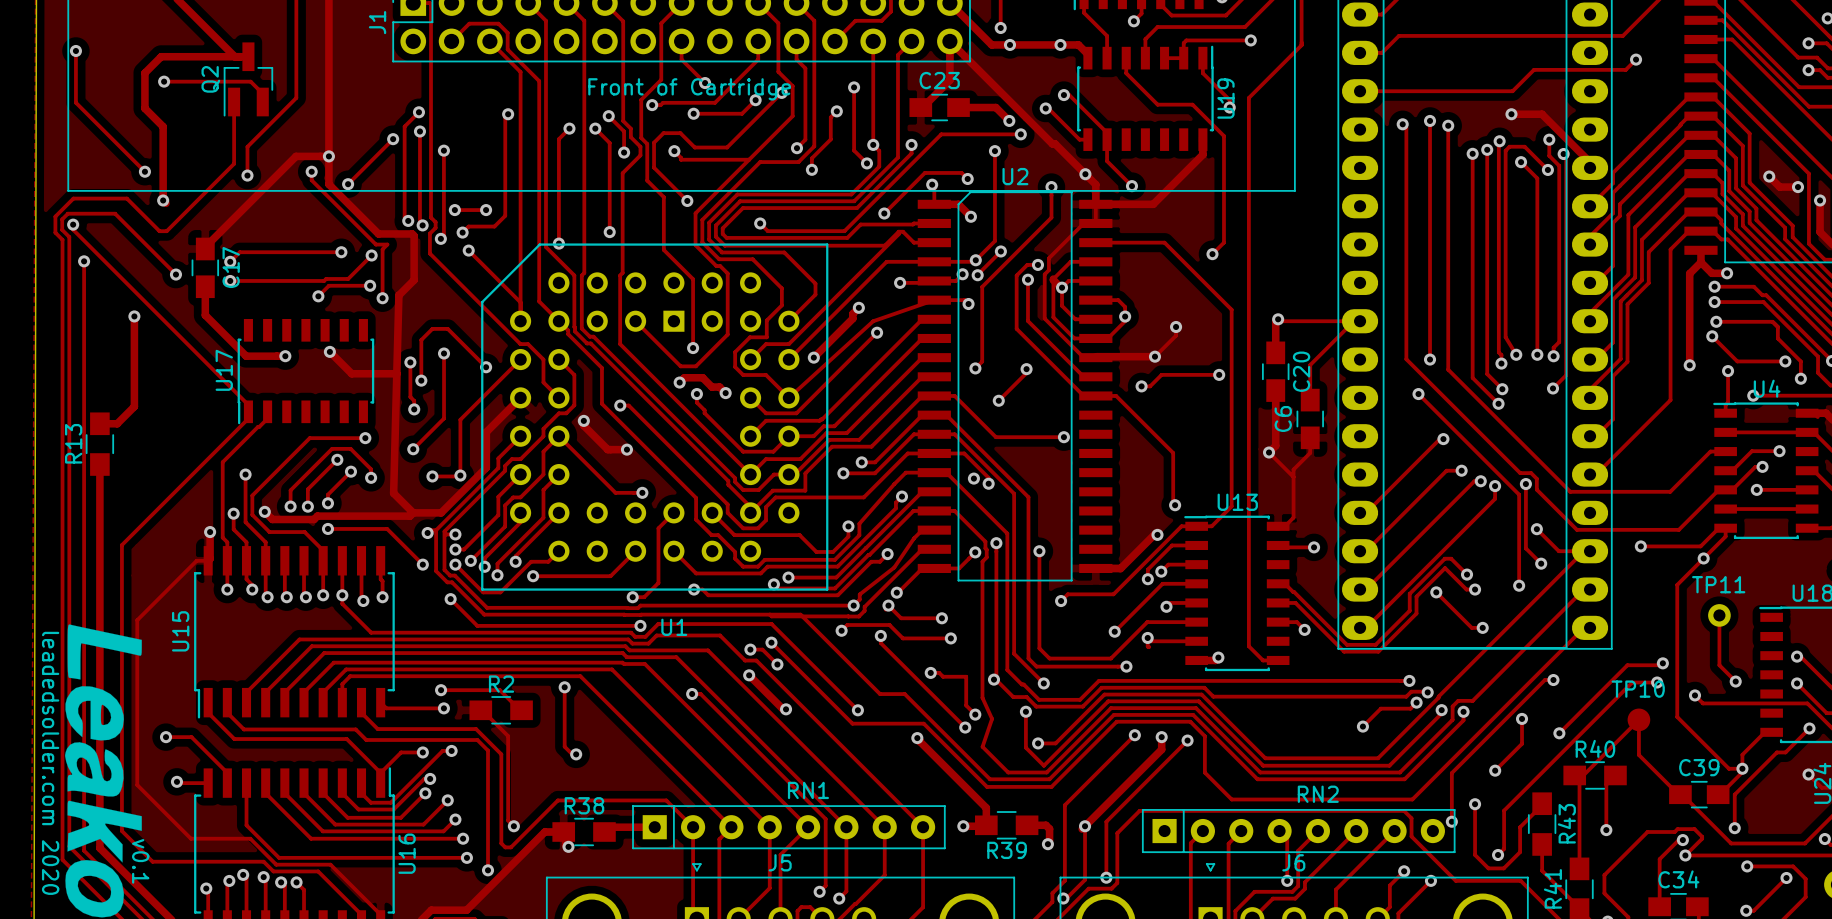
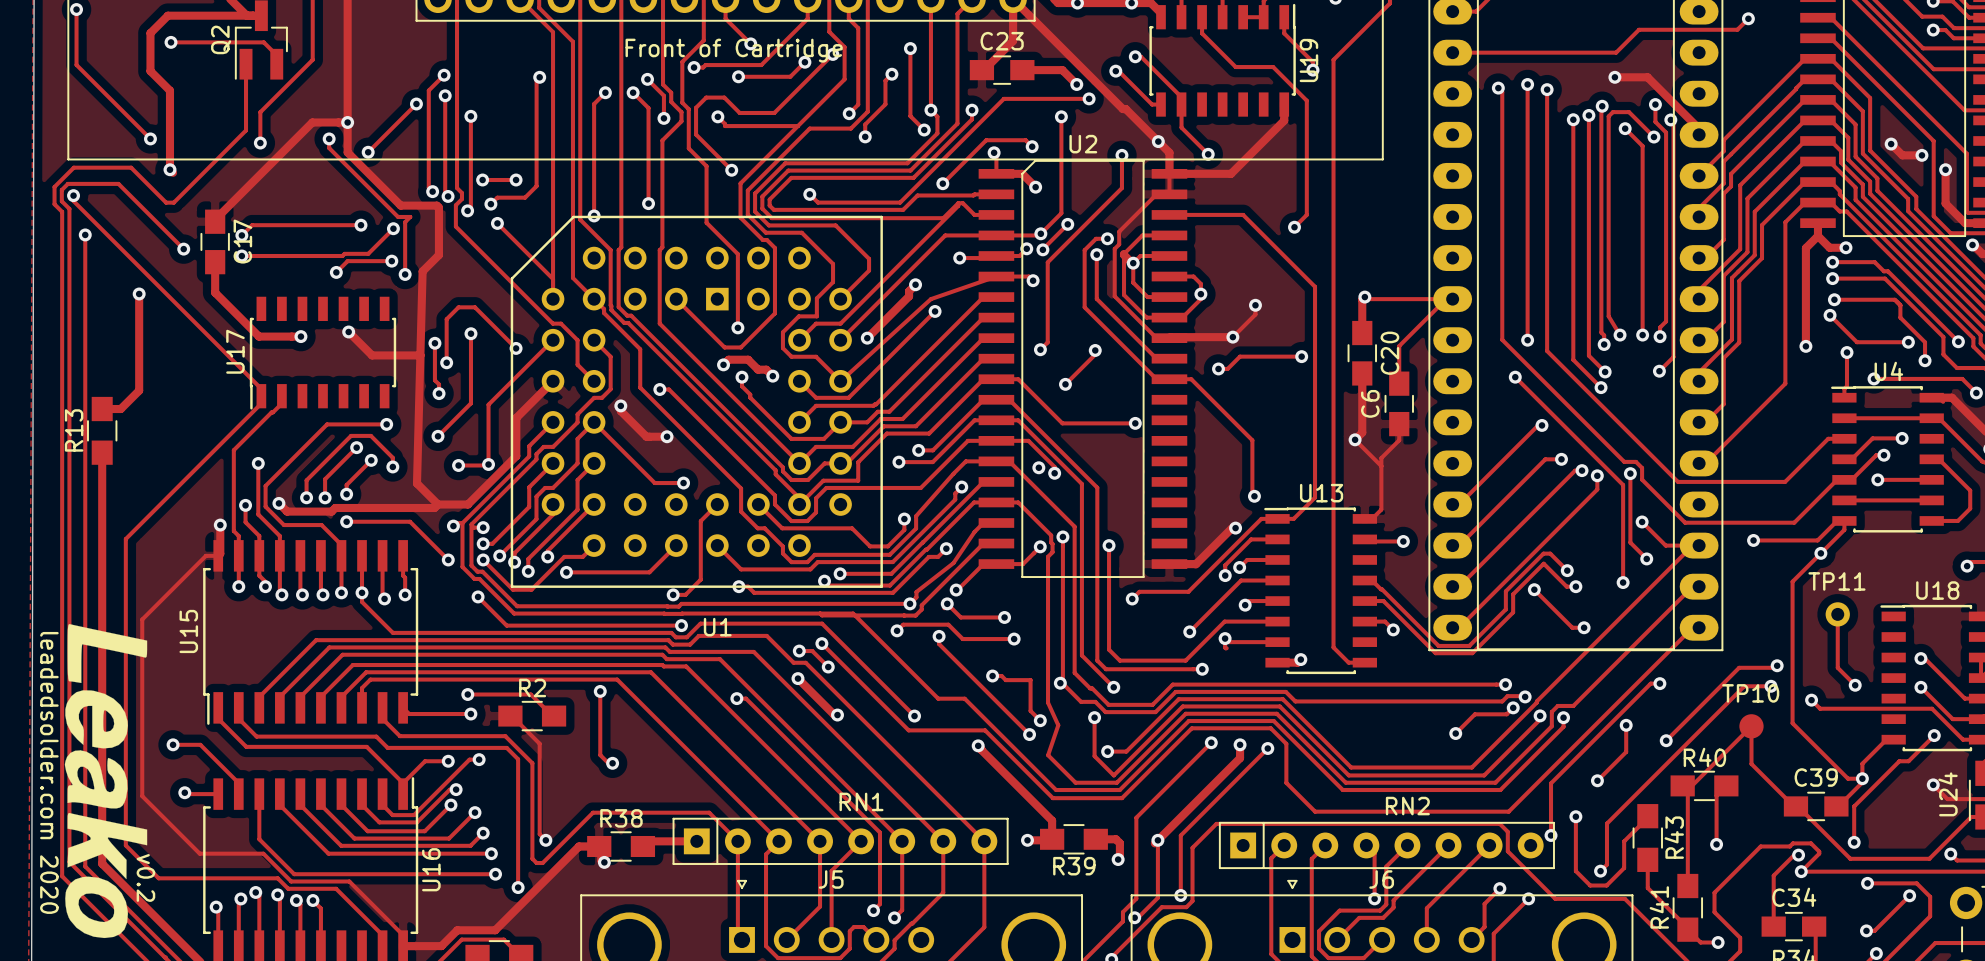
text: v0.1 (140, 861) -> v0.2 (145, 877)

